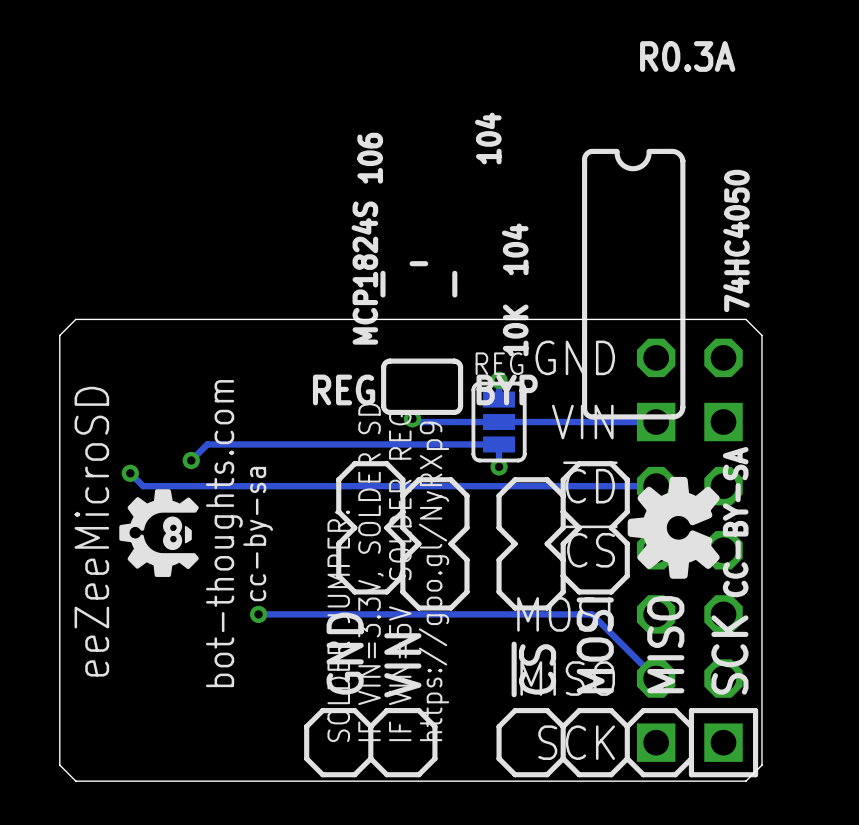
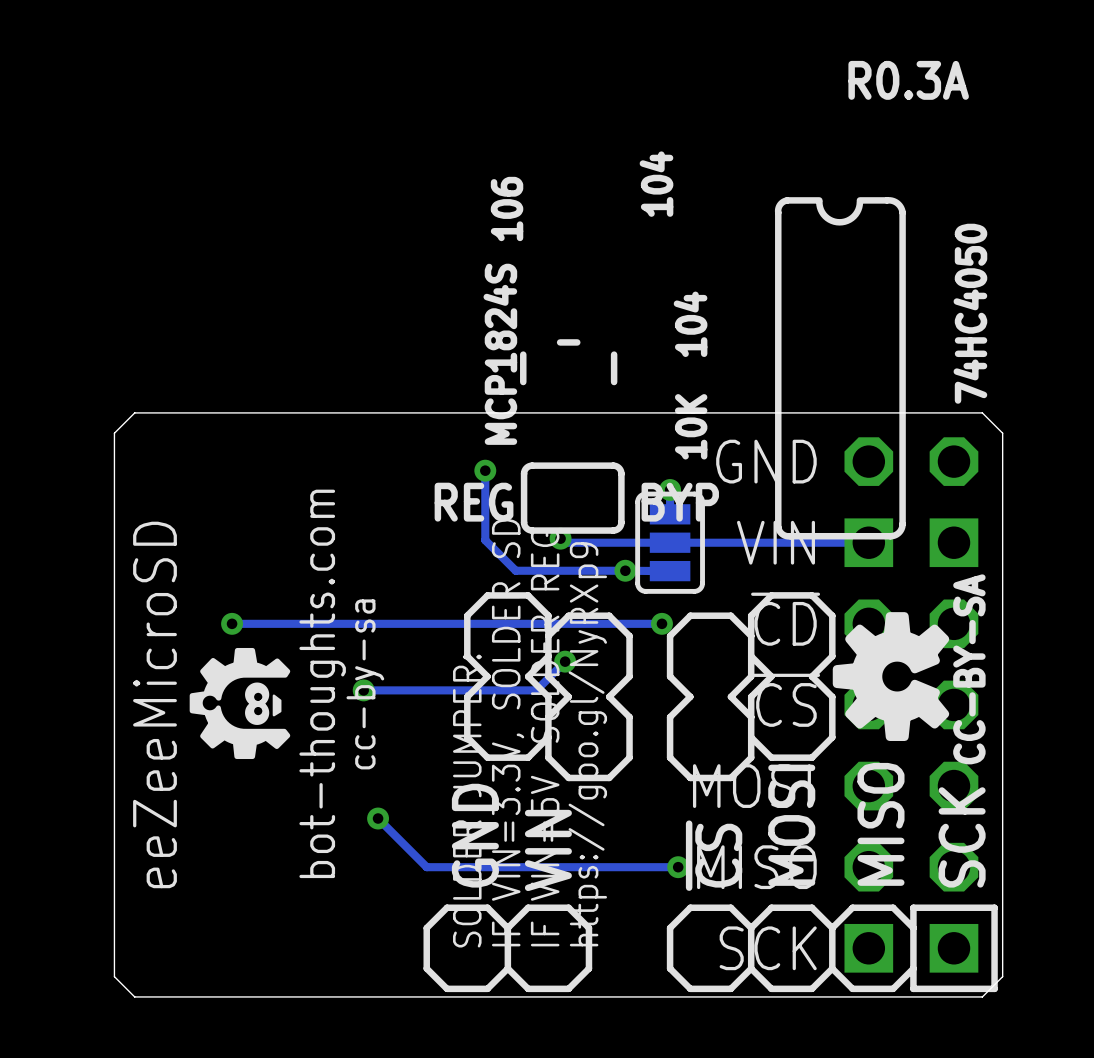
REG name: REG (499, 363) -> none
track: none -> (485, 470) (485, 540) (515, 570) (670, 571)
via: none -> (485, 470)
via: none -> (625, 570)
track: (191, 460) (207, 444) (499, 444) (499, 466) -> none
via: (191, 460) -> none
via position: (499, 466) -> (661, 623)
track: (130, 473) (143, 486) (152, 486) -> none
via: (130, 473) -> none
via: none -> (232, 623)
track: (656, 486) (492, 486) -> none
track: none -> (565, 661) (536, 690) (363, 690)
via: none -> (565, 661)
text position: eeZeeMicroSD (91, 531) -> eeZeeMicroSD (155, 704)
drawing position: (159, 533) -> (239, 703)
via: none -> (363, 690)
track: (258, 614) (592, 614) (656, 678) -> none
via position: (258, 614) -> (378, 818)
track: none -> (378, 818) (426, 867) (678, 867)
via: none -> (678, 867)

